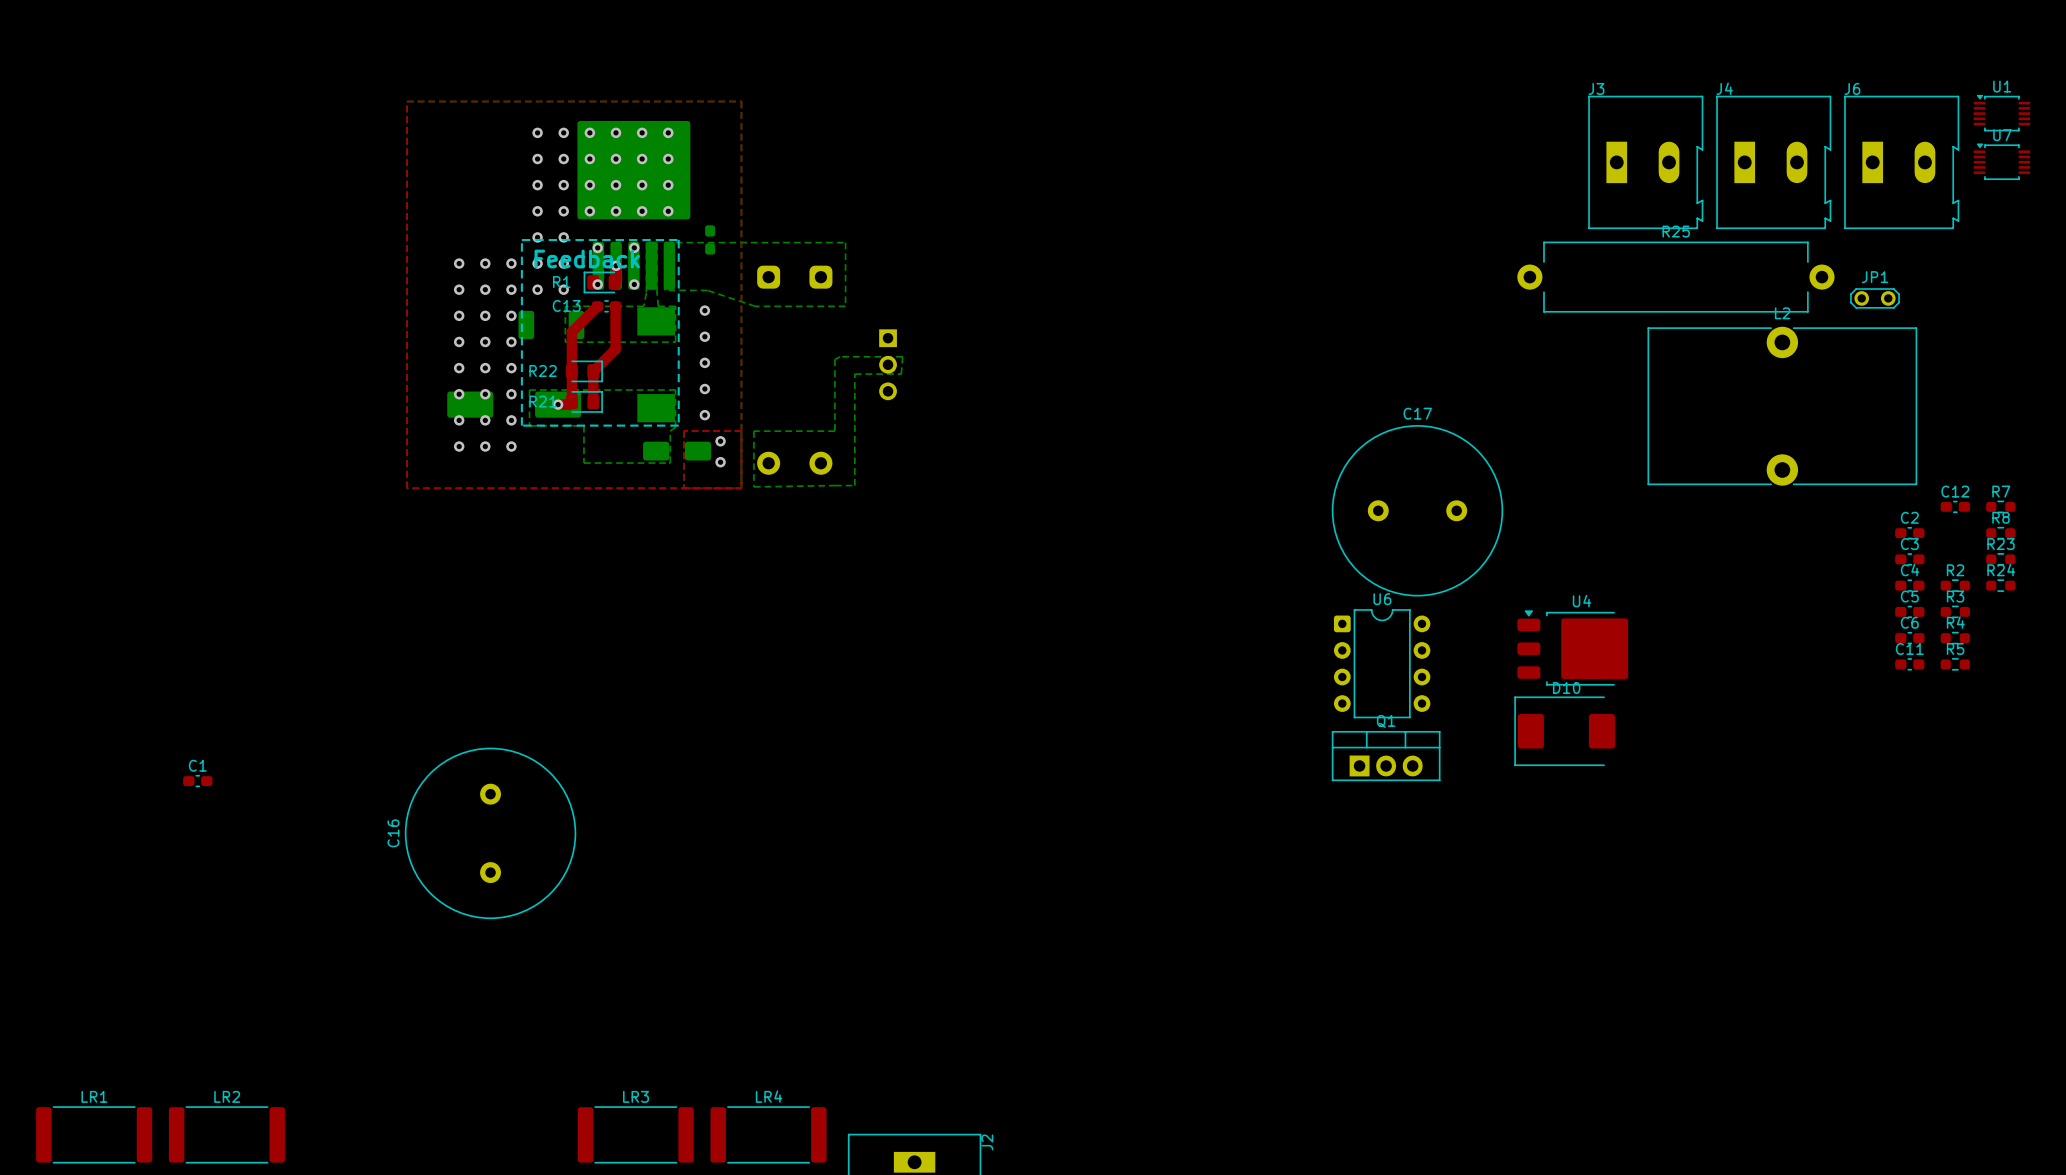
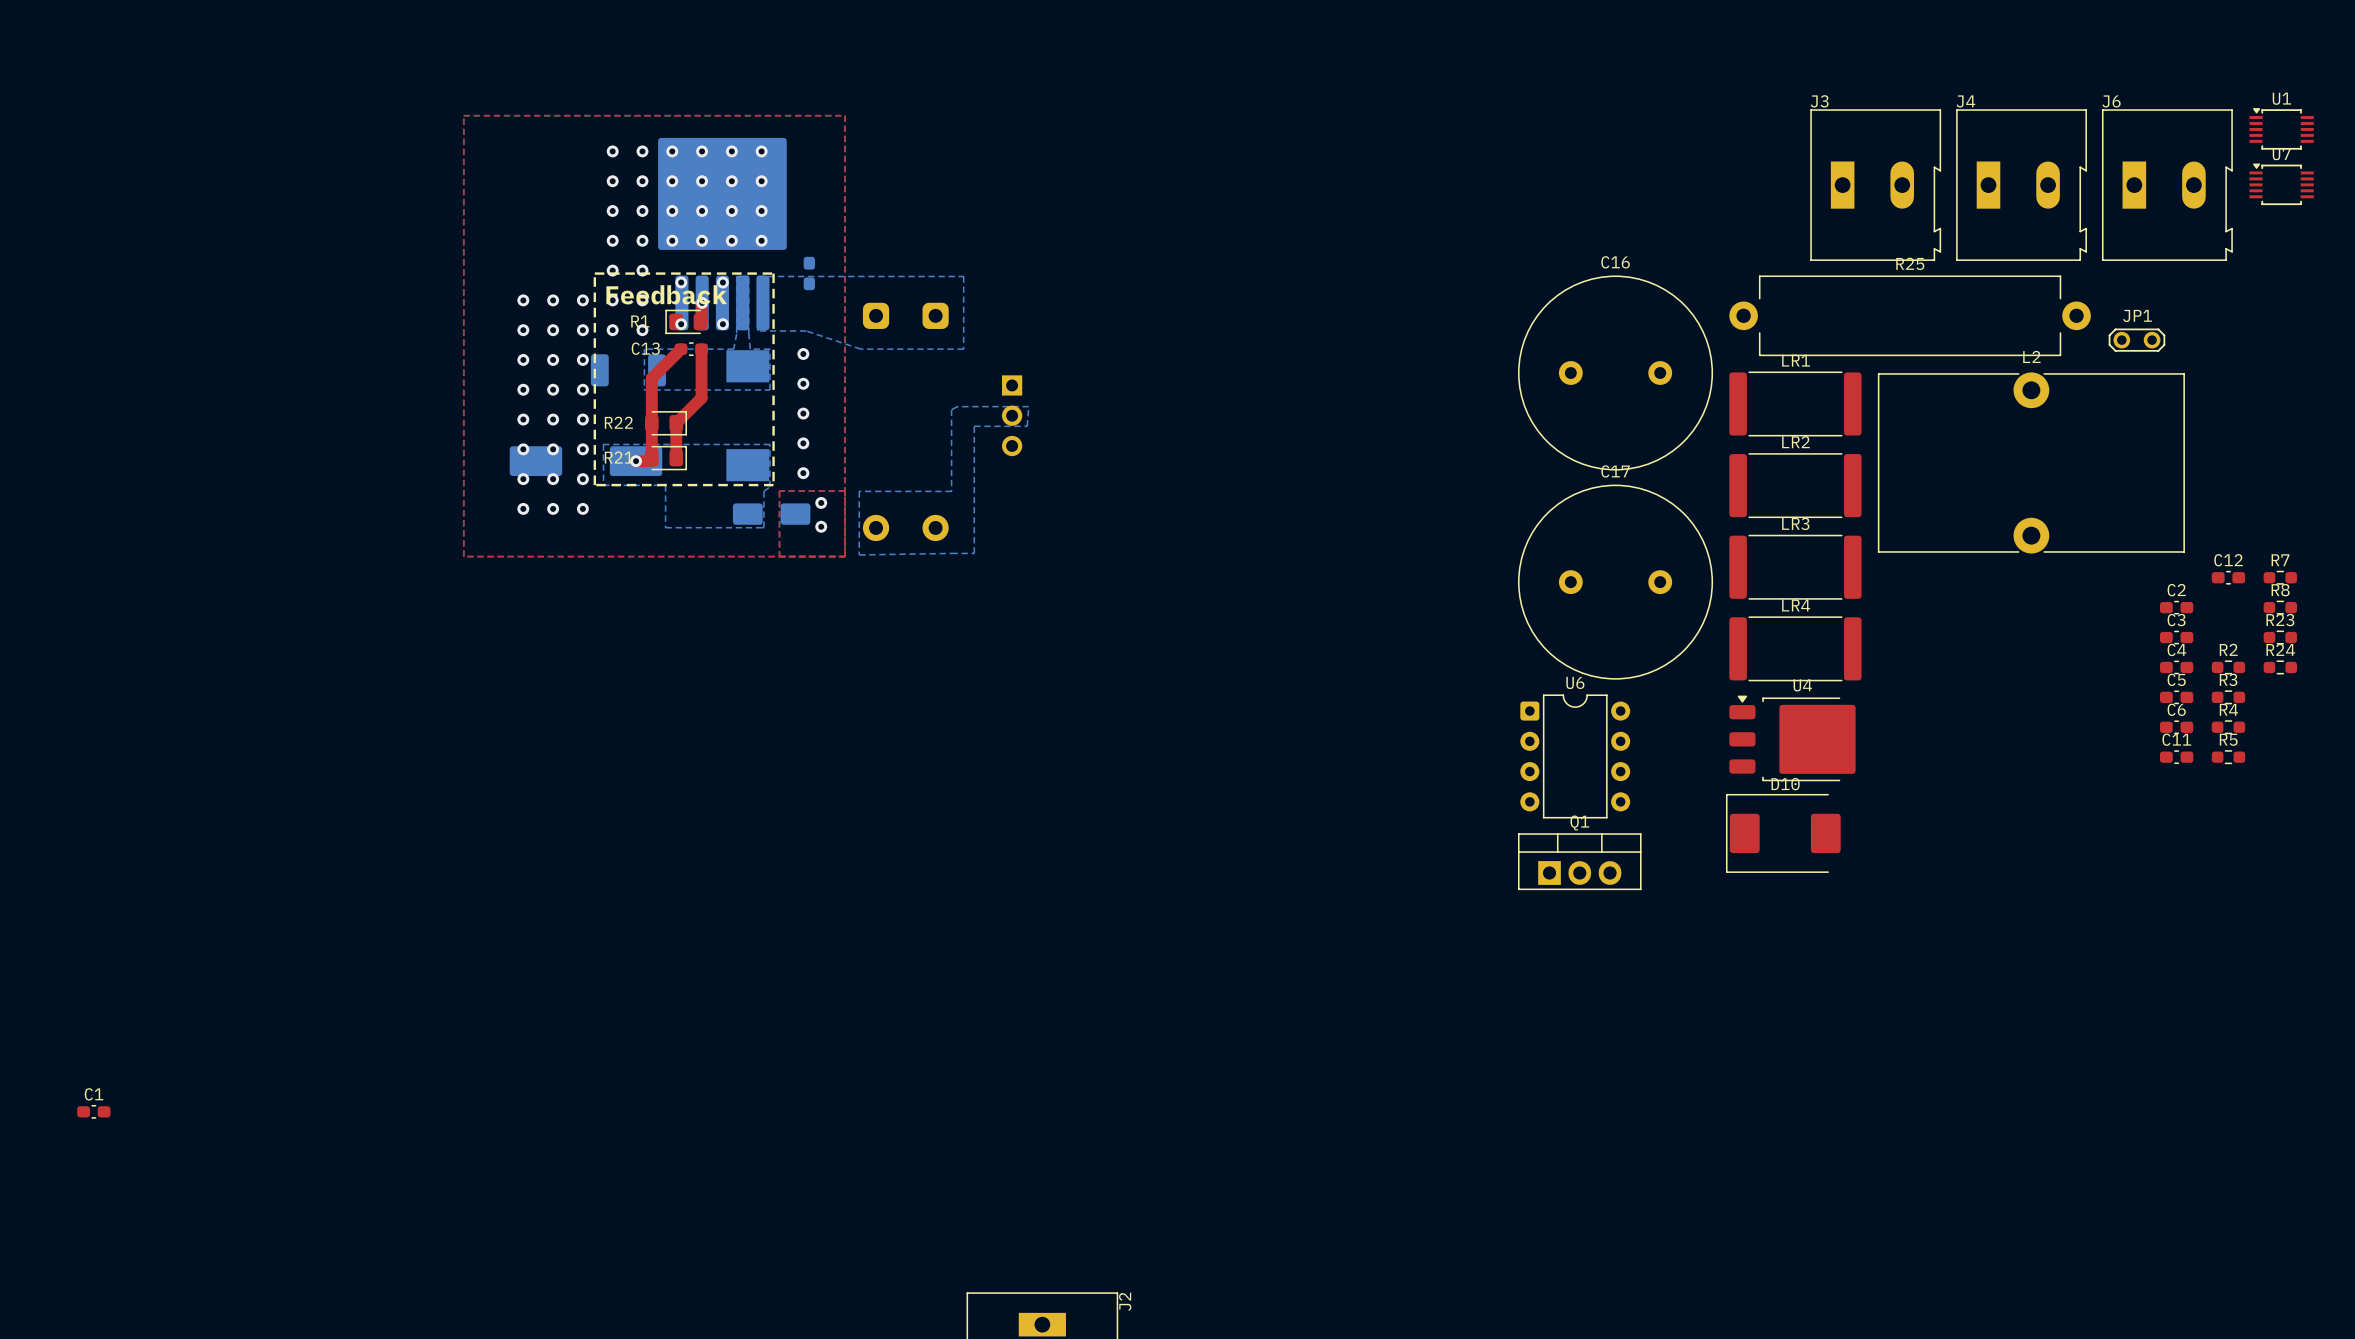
C1 position: (197, 781) -> (93, 1111)
C16 rotation: 0° (490, 833) -> 90° clockwise (1615, 373)
C16 position: (490, 833) -> (1615, 373)
LR1 position: (94, 1134) -> (1795, 403)
LR2 position: (226, 1134) -> (1795, 485)
LR3 position: (635, 1134) -> (1795, 567)
LR4 position: (768, 1134) -> (1795, 648)

